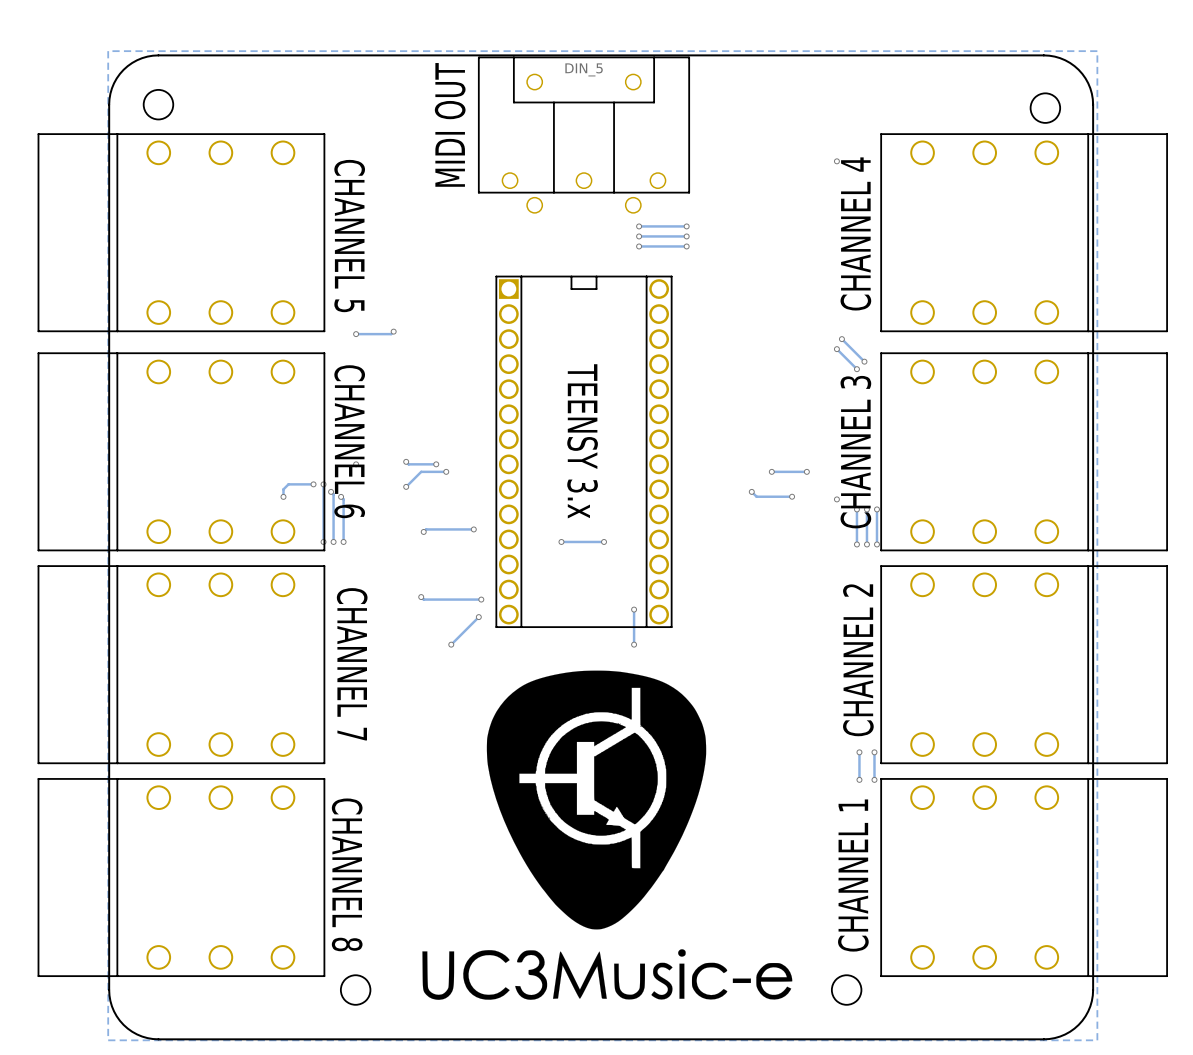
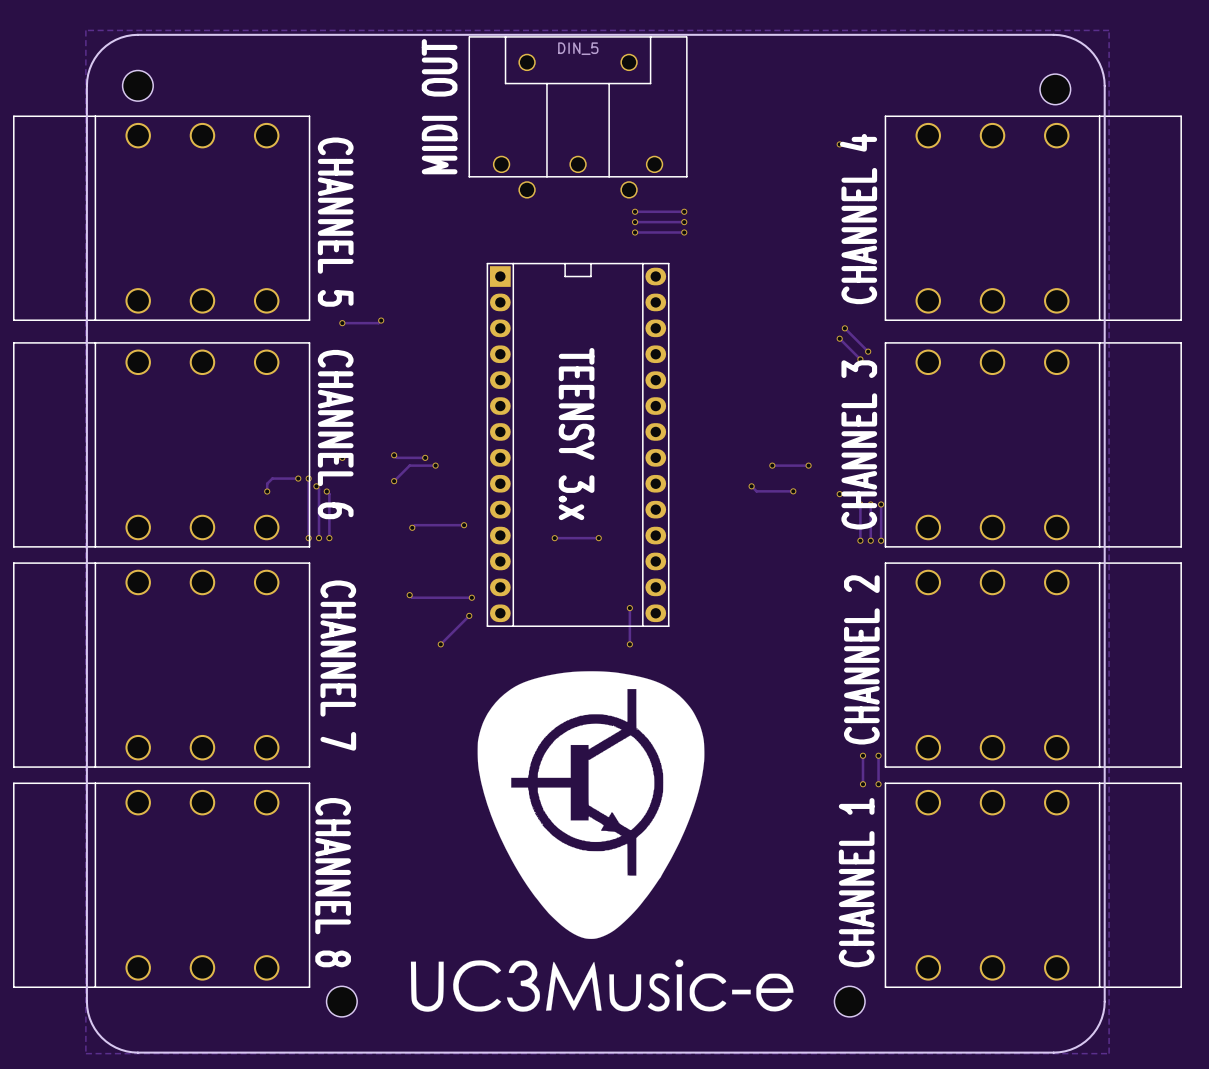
part footprint: [495, 275, 673, 628] -> [486, 262, 670, 627]

